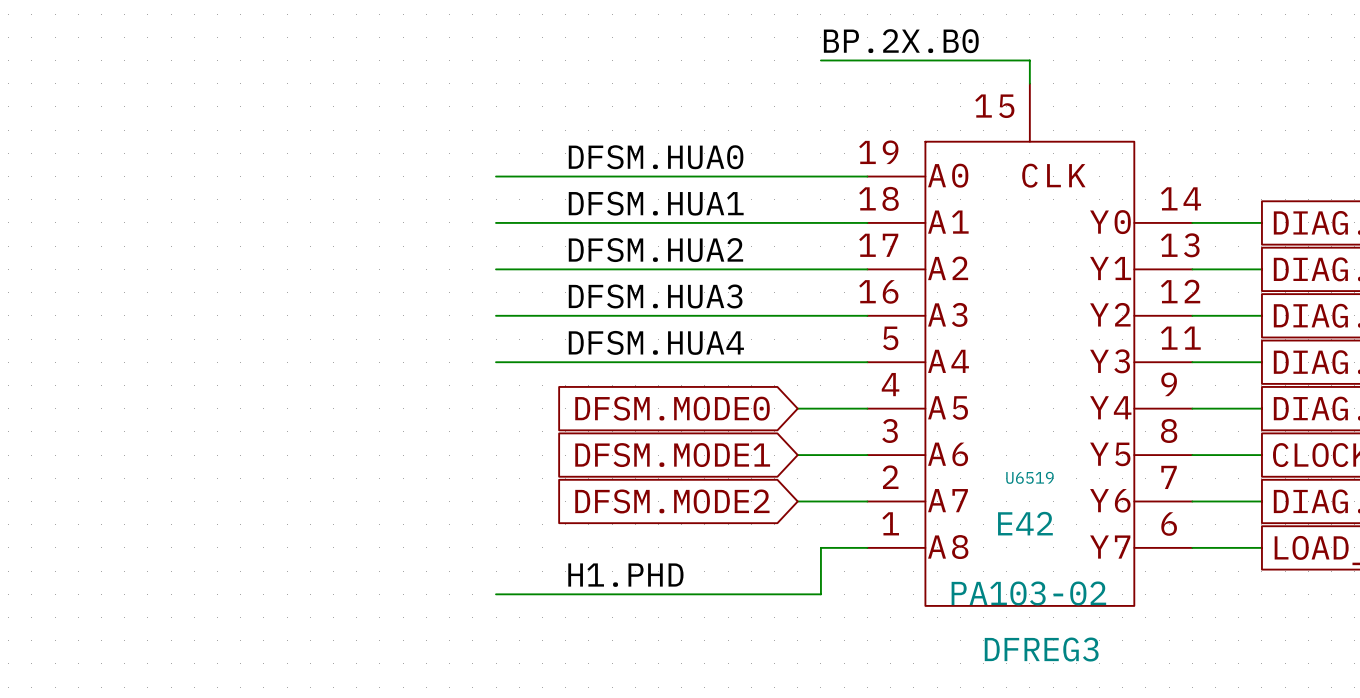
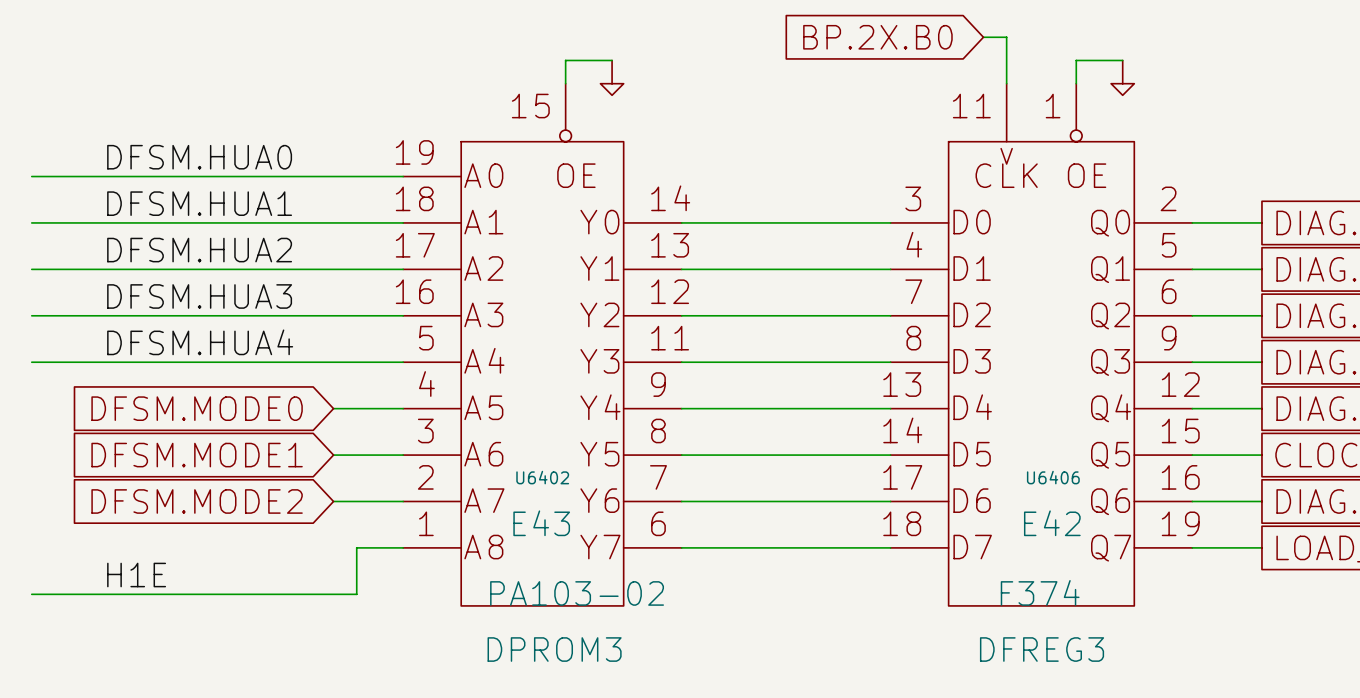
global label: none -> BP.2X.B0 (877, 37)
wire: none -> (983, 37) (1006, 37) (1006, 83)
label: BP.2X.B0 (901, 41) -> none
wire: none -> (612, 60) (565, 60) (565, 83)
wire: (820, 60) (1029, 60) (1029, 83) -> none
wire: none -> (1122, 60) (1076, 60) (1076, 83)
power symbol: none -> (612, 78)
power symbol: none -> (1122, 78)
label: none -> DFSM.HUA0 (199, 157)
label: DFSM.HUA0 (656, 157) -> none
wire: none -> (31, 176) (403, 176)
wire: (496, 176) (867, 176) -> none
label: none -> DFSM.HUA1 (199, 203)
label: DFSM.HUA1 (656, 203) -> none
wire: none -> (31, 222) (403, 222)
wire: (496, 222) (681, 222) -> none
label: none -> DFSM.HUA2 (199, 250)
label: DFSM.HUA2 (655, 250) -> none
wire: none -> (31, 269) (403, 269)
wire: (496, 269) (681, 269) -> none
label: none -> DFSM.HUA3 (199, 296)
label: DFSM.HUA3 (655, 296) -> none
wire: none -> (31, 315) (403, 315)
wire: (496, 315) (681, 315) -> none
label: none -> DFSM.HUA4 (200, 342)
label: DFSM.HUA4 (656, 342) -> none
U6402: none -> PA103-02 (542, 344)
U6519: PA103-02 (1029, 344) -> none
U6406: none -> F374 (1041, 344)
wire: none -> (31, 362) (403, 362)
wire: (496, 362) (681, 362) -> none
global label: none -> DFSM.MODE0 (197, 408)
wire: none -> (333, 408) (403, 408)
global label: DFSM.MODE0 (672, 408) -> none
wire: none -> (681, 408) (797, 408)
global label: none -> DFSM.MODE1 (197, 455)
wire: none -> (333, 455) (403, 455)
global label: DFSM.MODE1 (672, 455) -> none
wire: none -> (681, 455) (797, 455)
global label: none -> DFSM.MODE2 (197, 501)
wire: none -> (333, 501) (403, 501)
global label: DFSM.MODE2 (672, 501) -> none
wire: none -> (681, 501) (797, 501)
wire: none -> (403, 547) (356, 547) (356, 594) (31, 594)
wire: (820, 547) (820, 594) (496, 594) -> (820, 547) (681, 547)
label: none -> H1E (136, 575)
label: H1.PHD (625, 575) -> none

